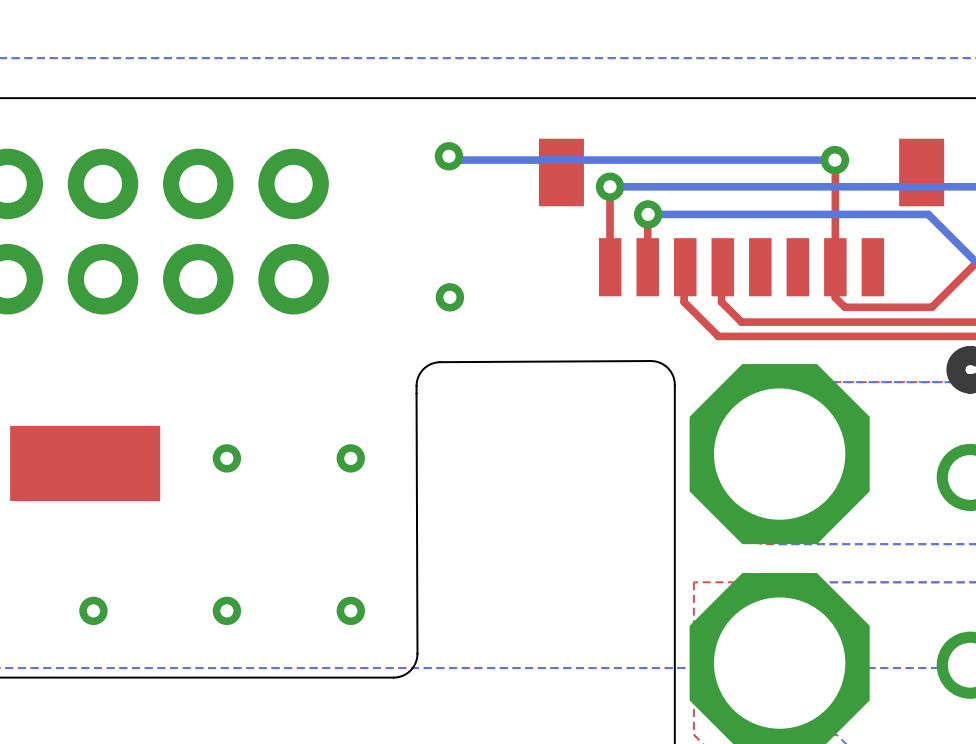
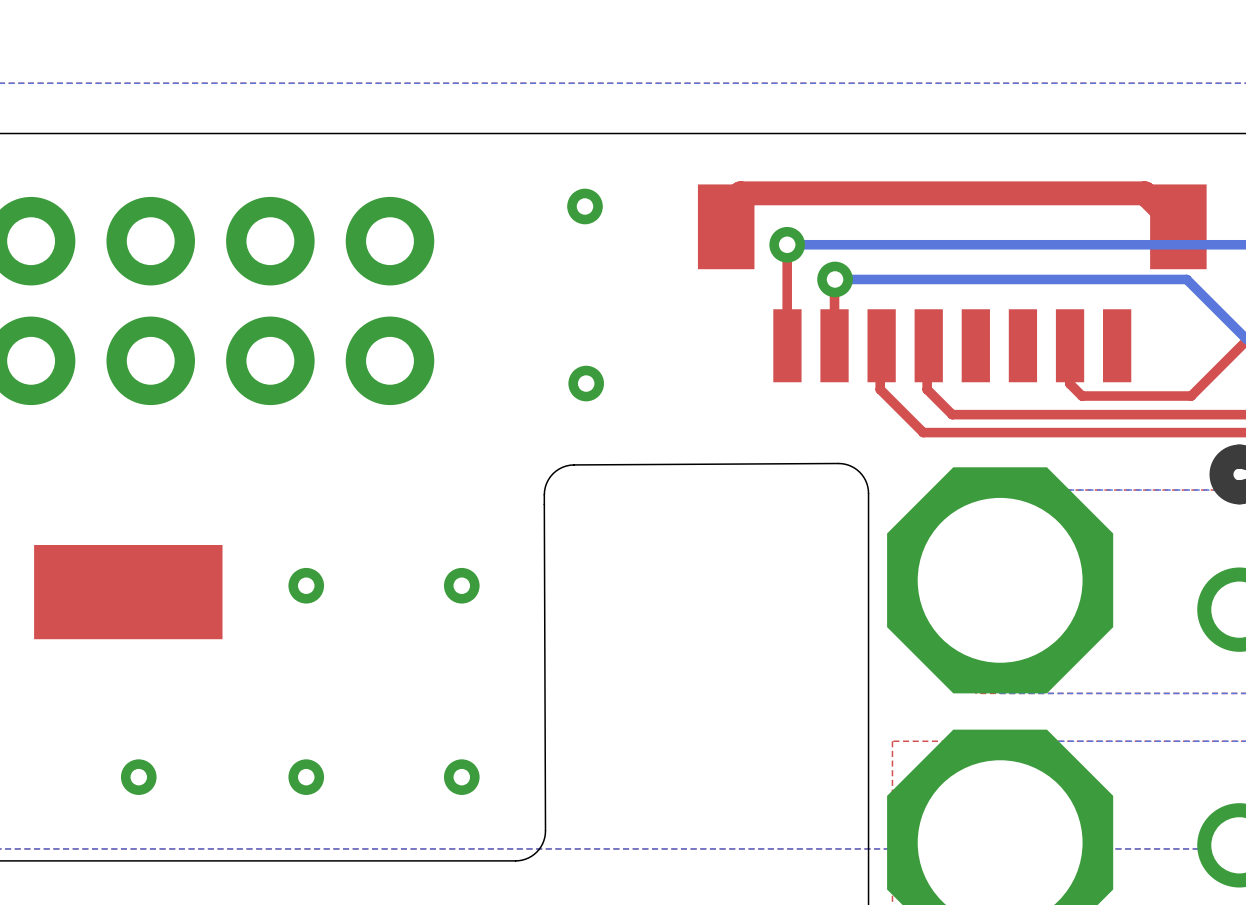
bottom track: (448, 156) (452, 160) (834, 160) -> none
via: (834, 160) -> none
top track: (835, 160) (835, 267) -> none
top track: none -> (1178, 226) (1144, 193) (740, 193) (726, 207) (726, 226)

